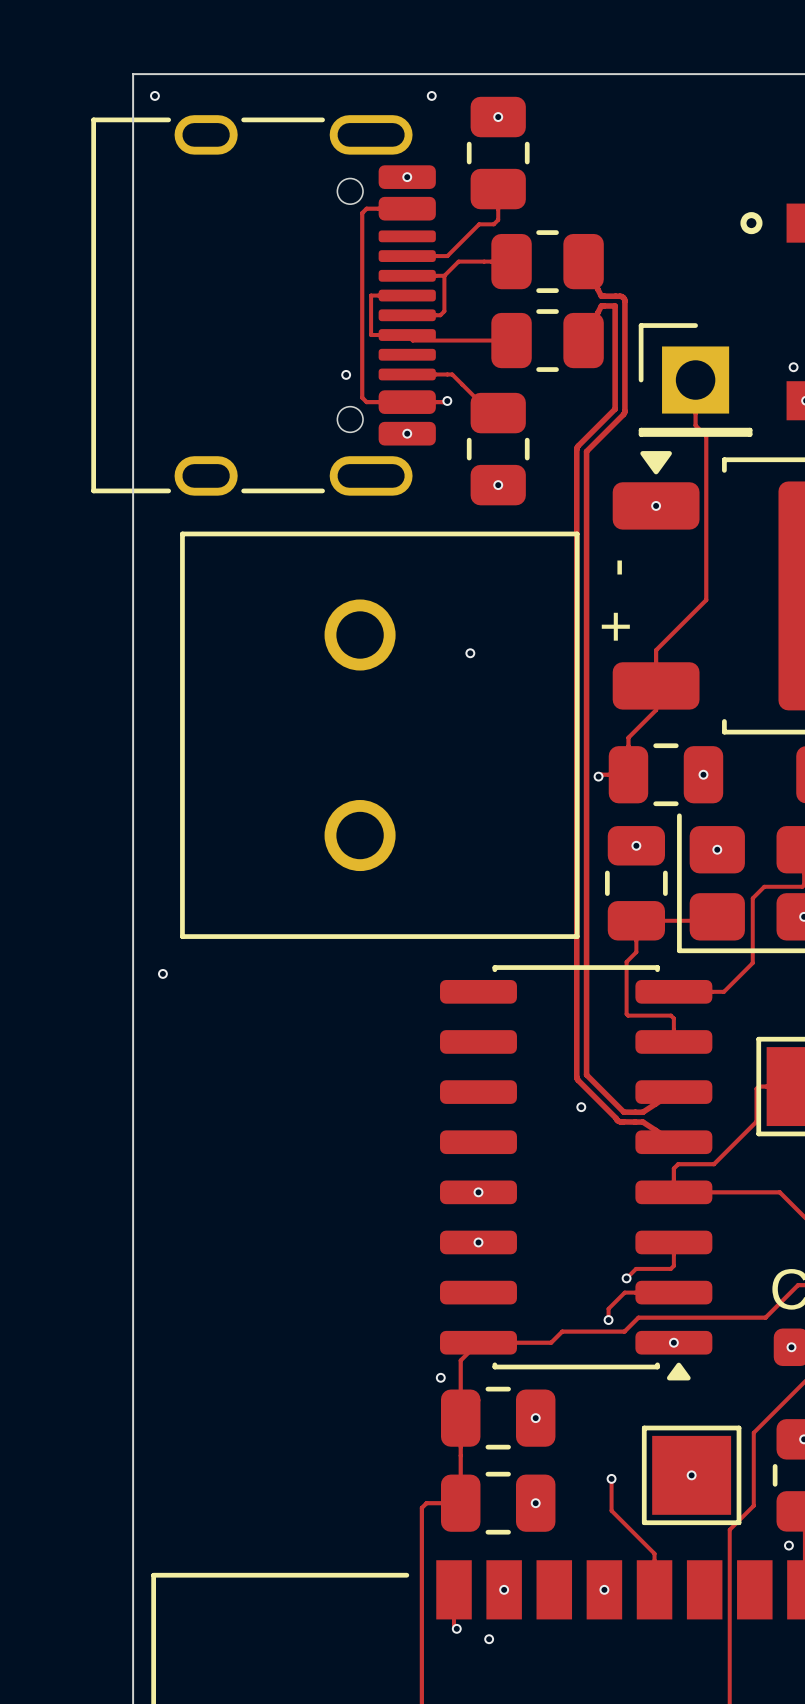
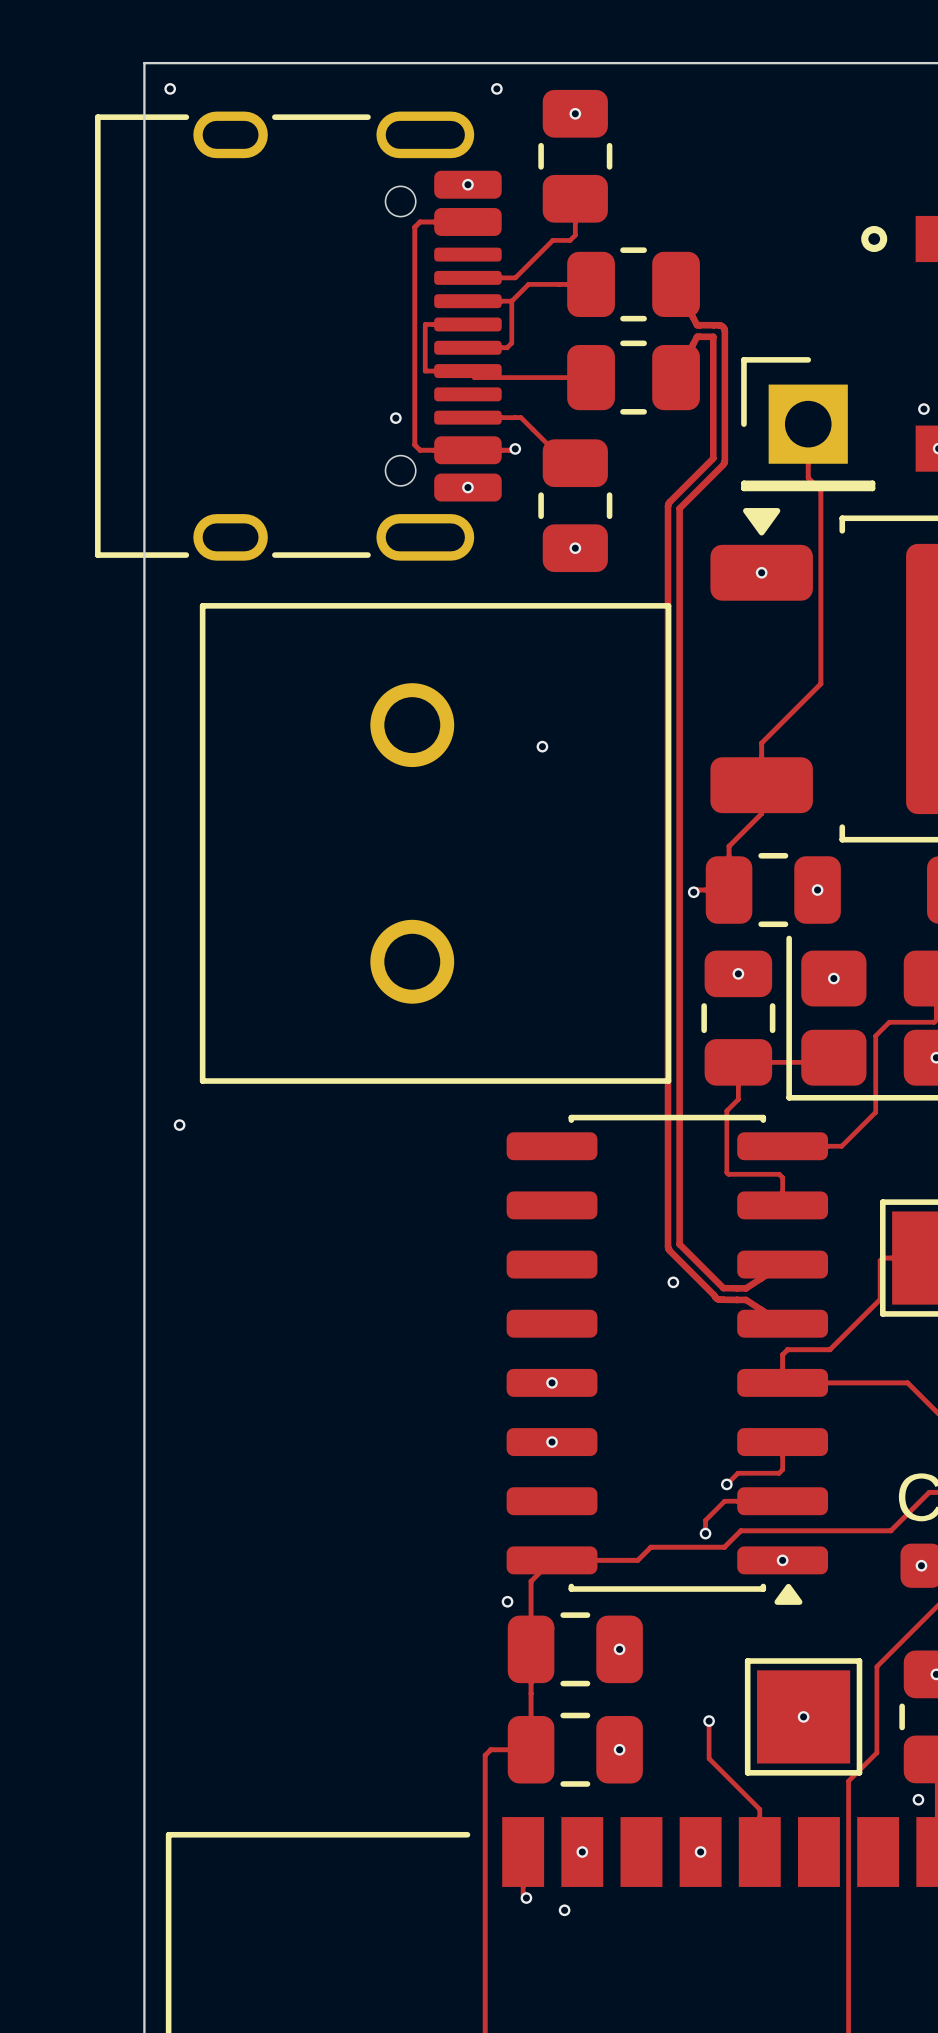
text: - (619, 567) -> none
text: + (615, 626) -> none

